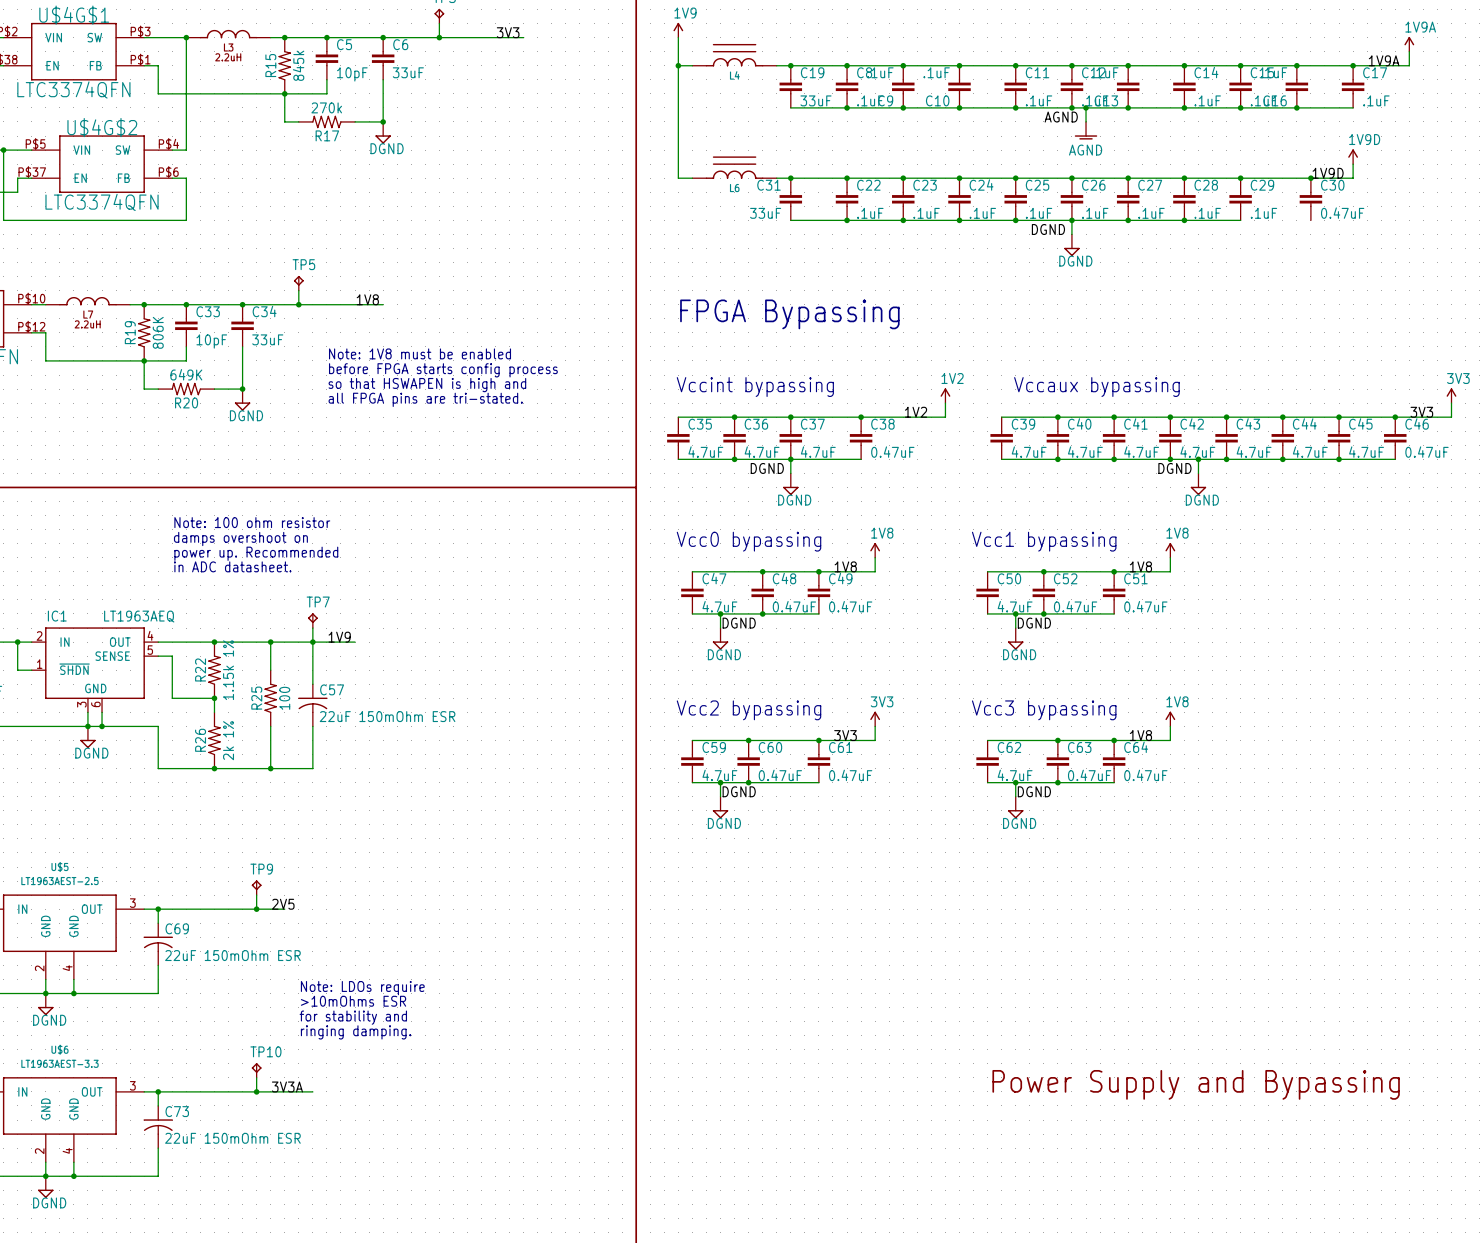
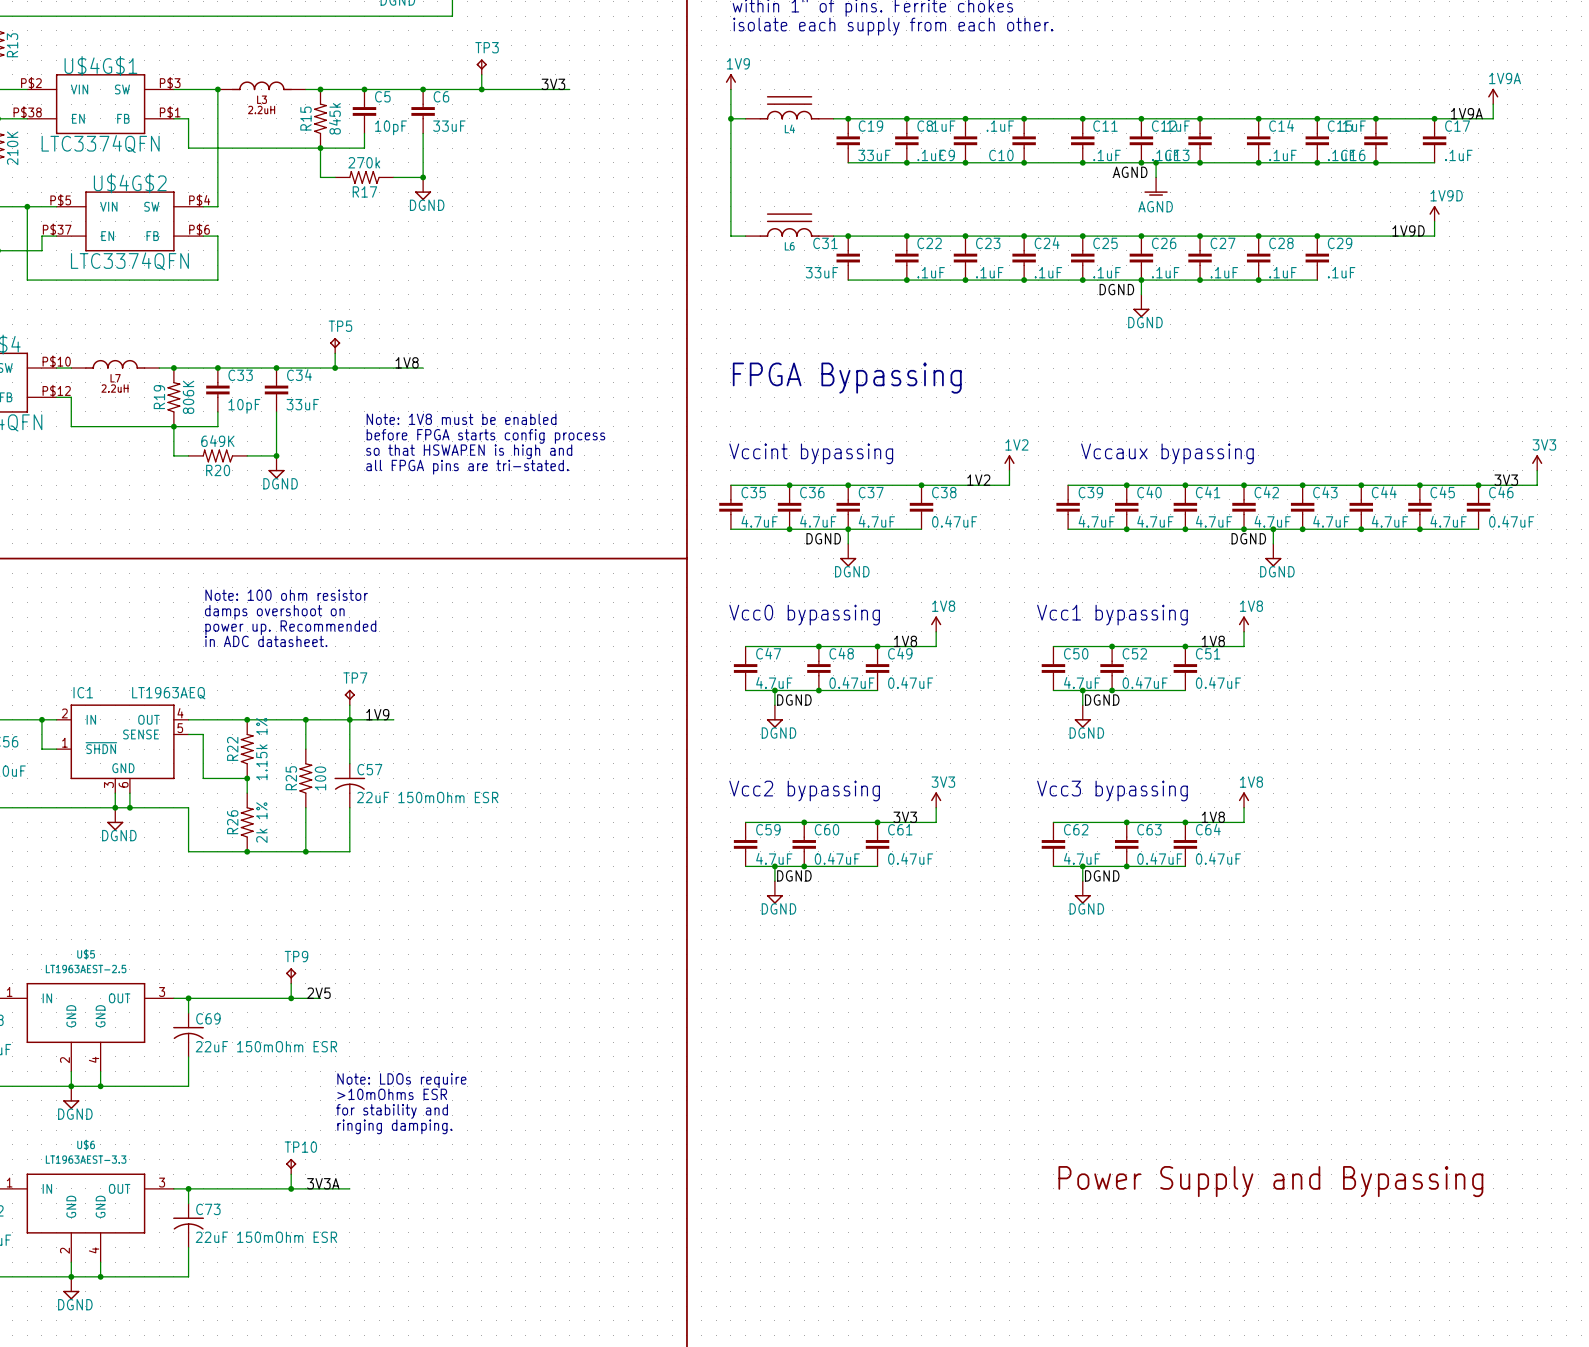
junction: (1310, 178) -> none
C30: 0.47uF (1310, 199) -> none

